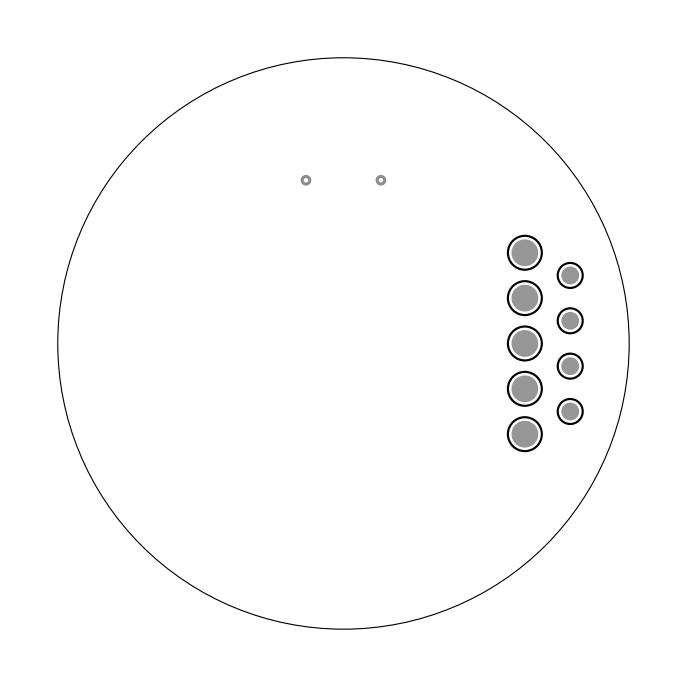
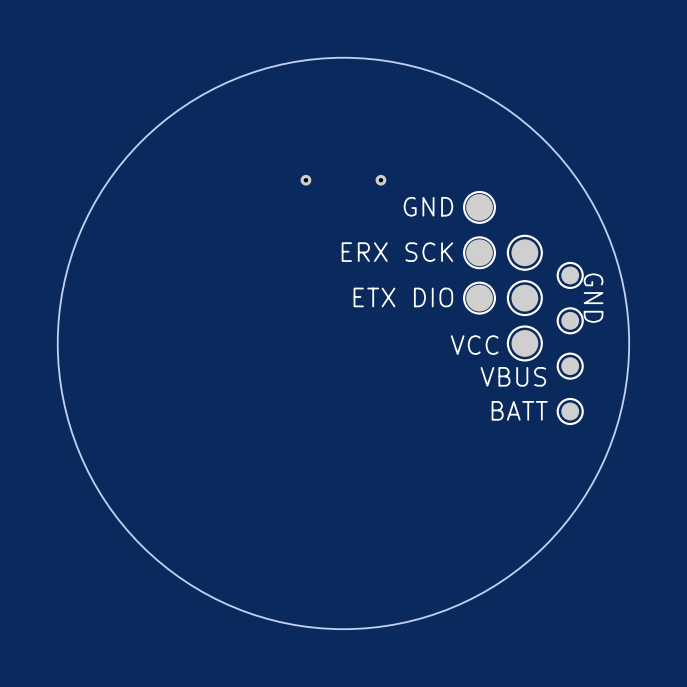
text: none -> GND (428, 206)
part: none -> (479, 207)
text: none -> ERX SCK (397, 252)
part: none -> (479, 252)
text: none -> ETX DIO (403, 297)
part: none -> (479, 298)
text: none -> GND (593, 298)
text: none -> VCC (474, 345)
text: none -> VBUS (513, 376)
part: (524, 388) -> none
text: none -> BATT (519, 410)
part: (524, 434) -> none

